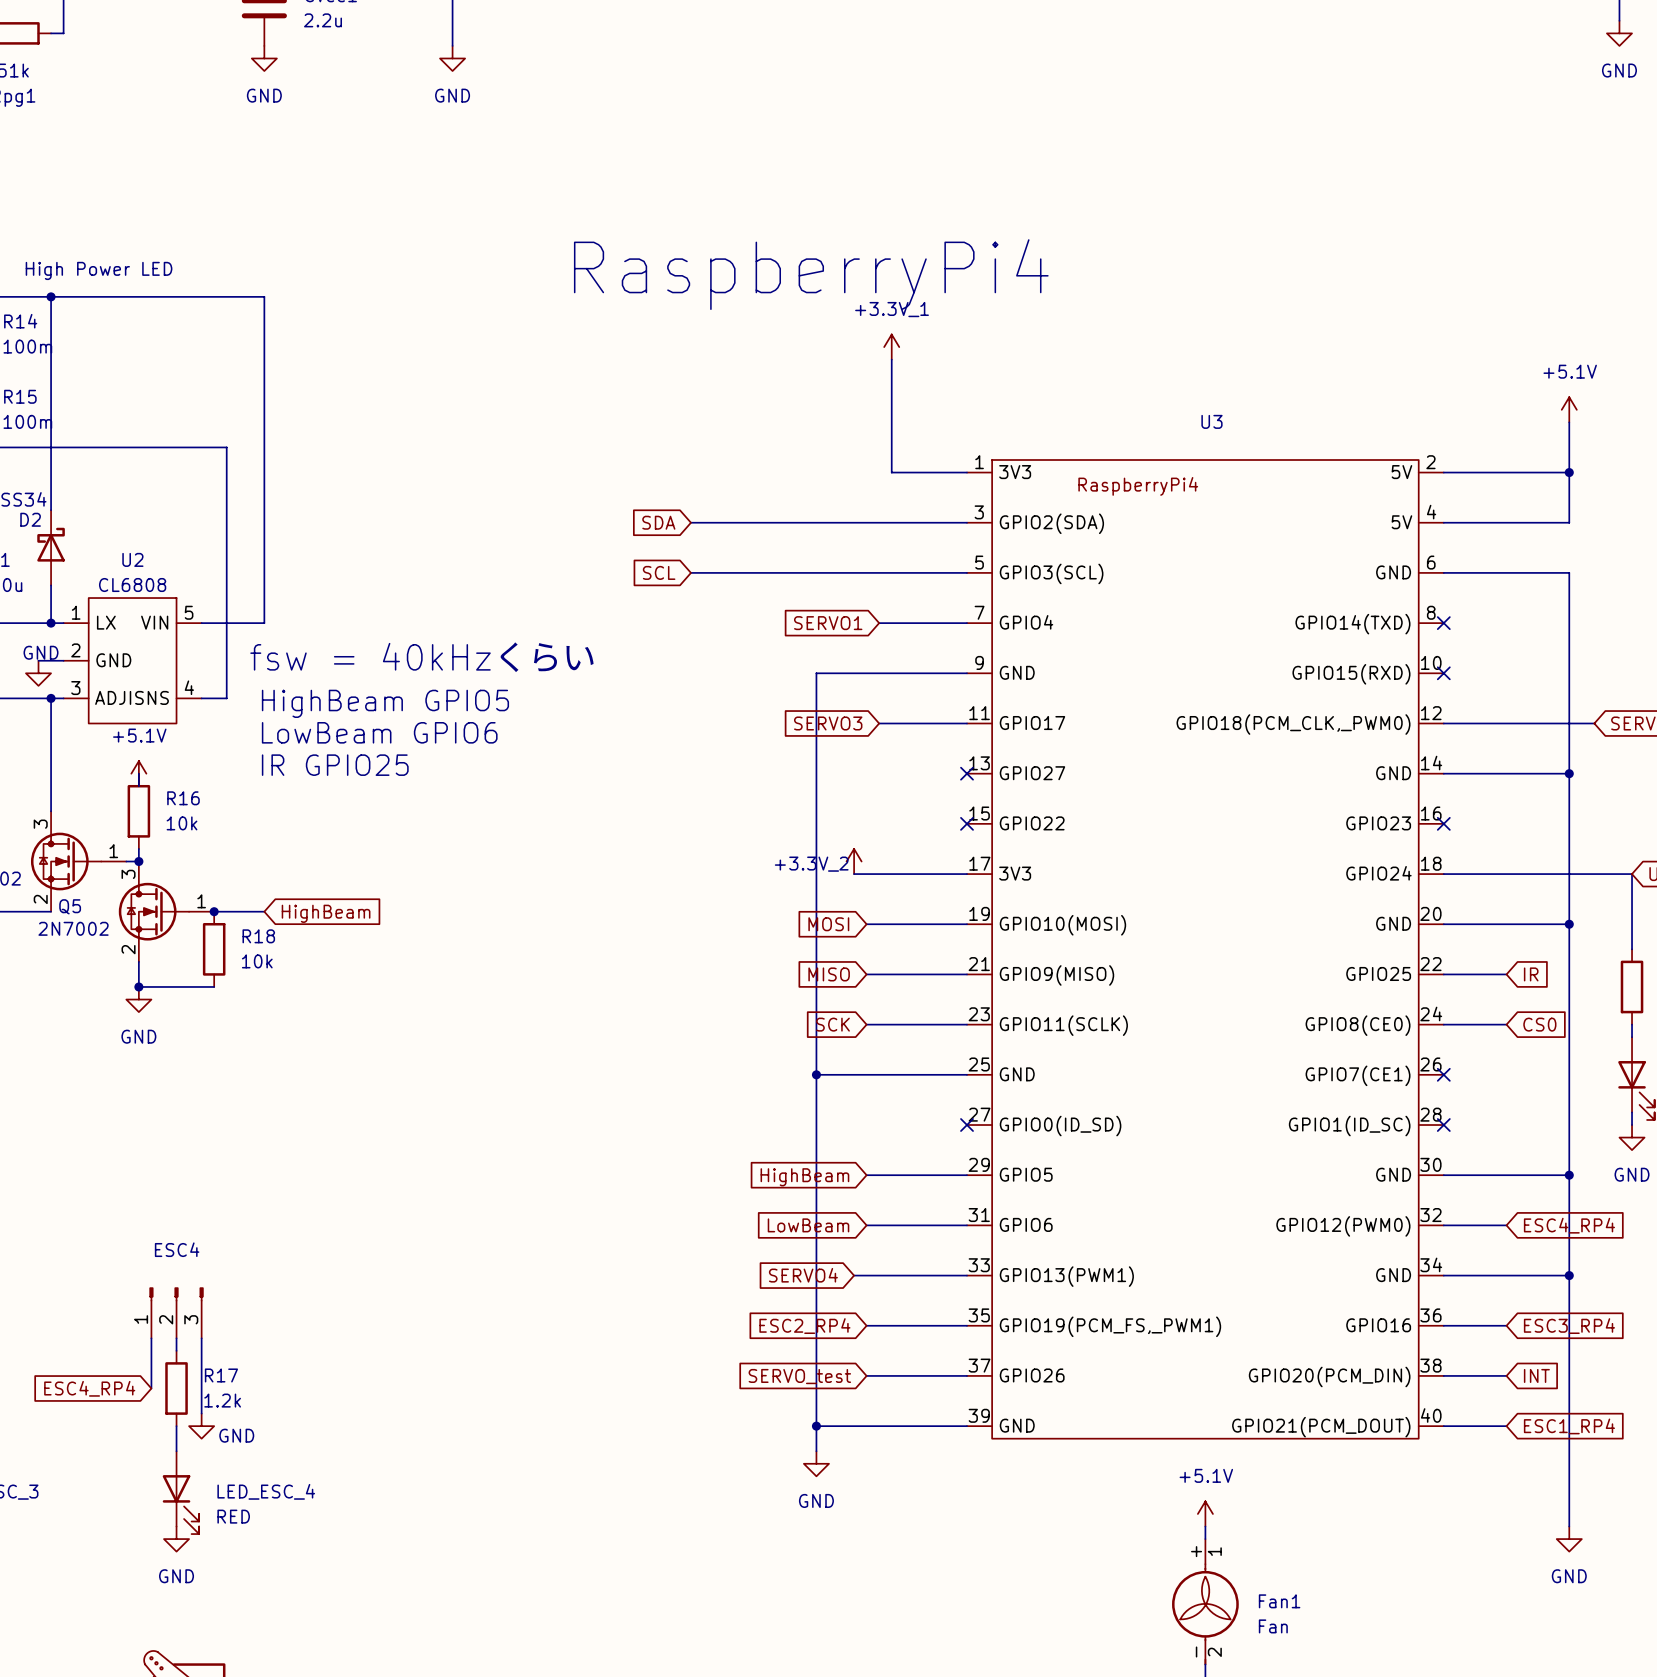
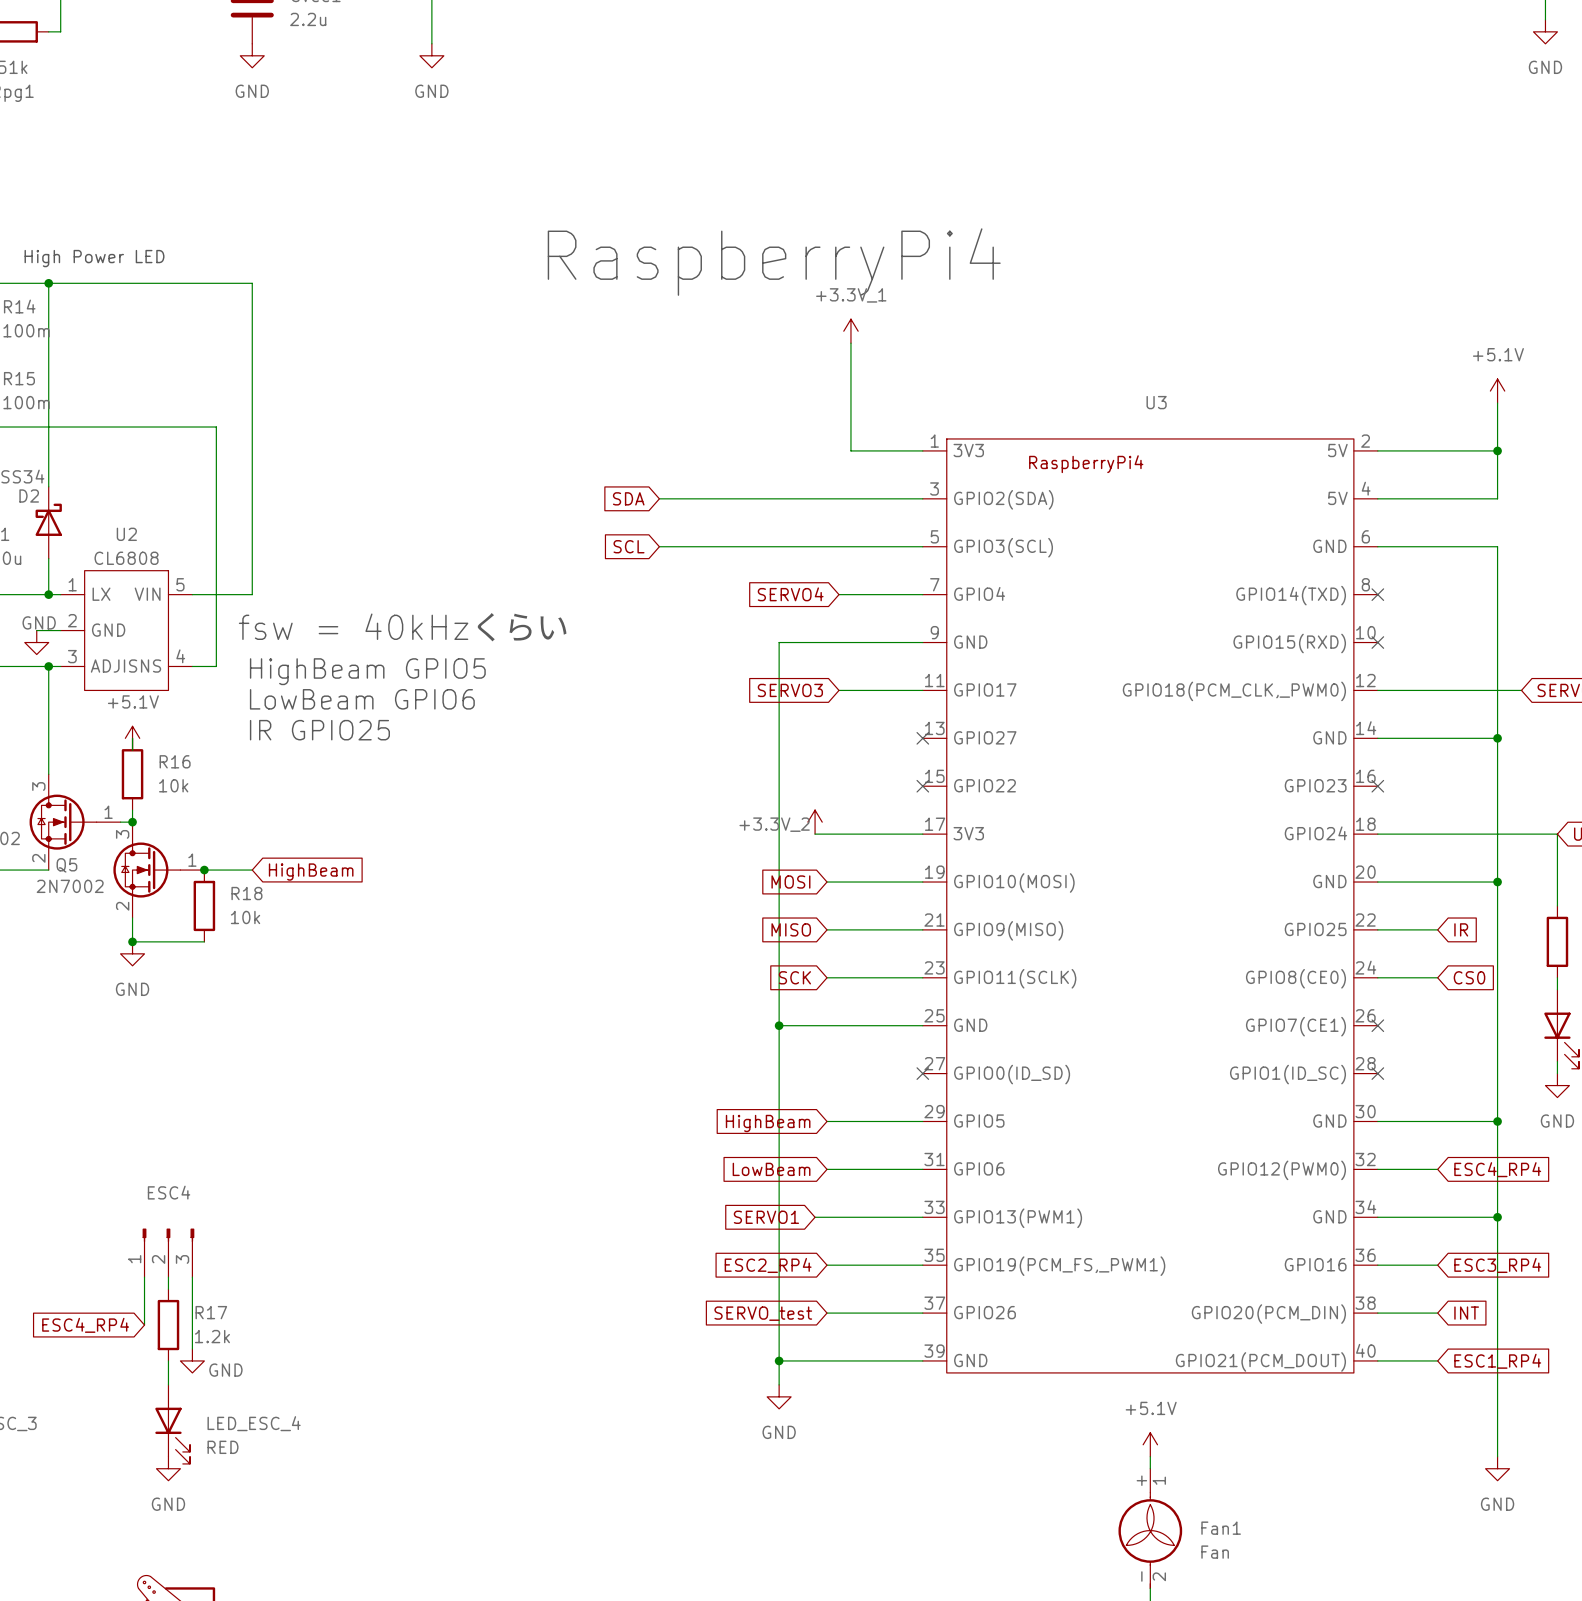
global label: SERVO1 (828, 623) -> SERVO4 (790, 594)
global label: SERVO4 (803, 1275) -> SERVO1 (766, 1217)

